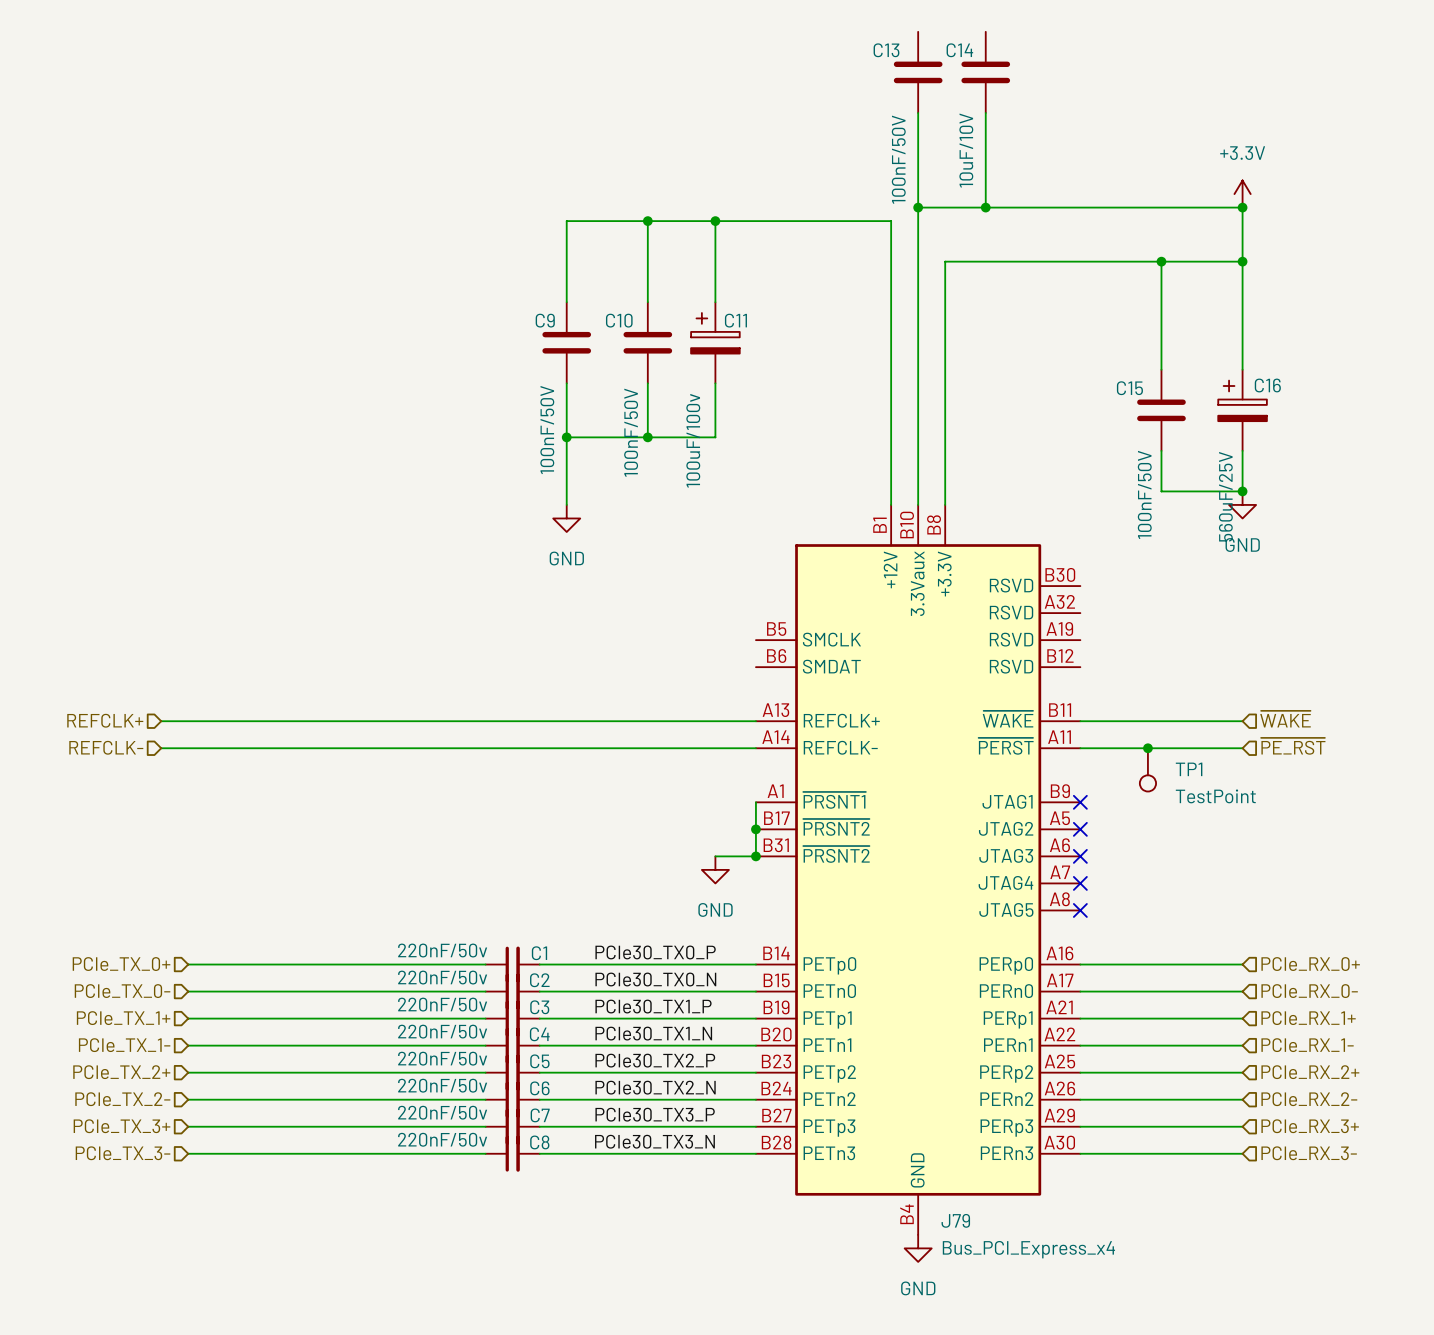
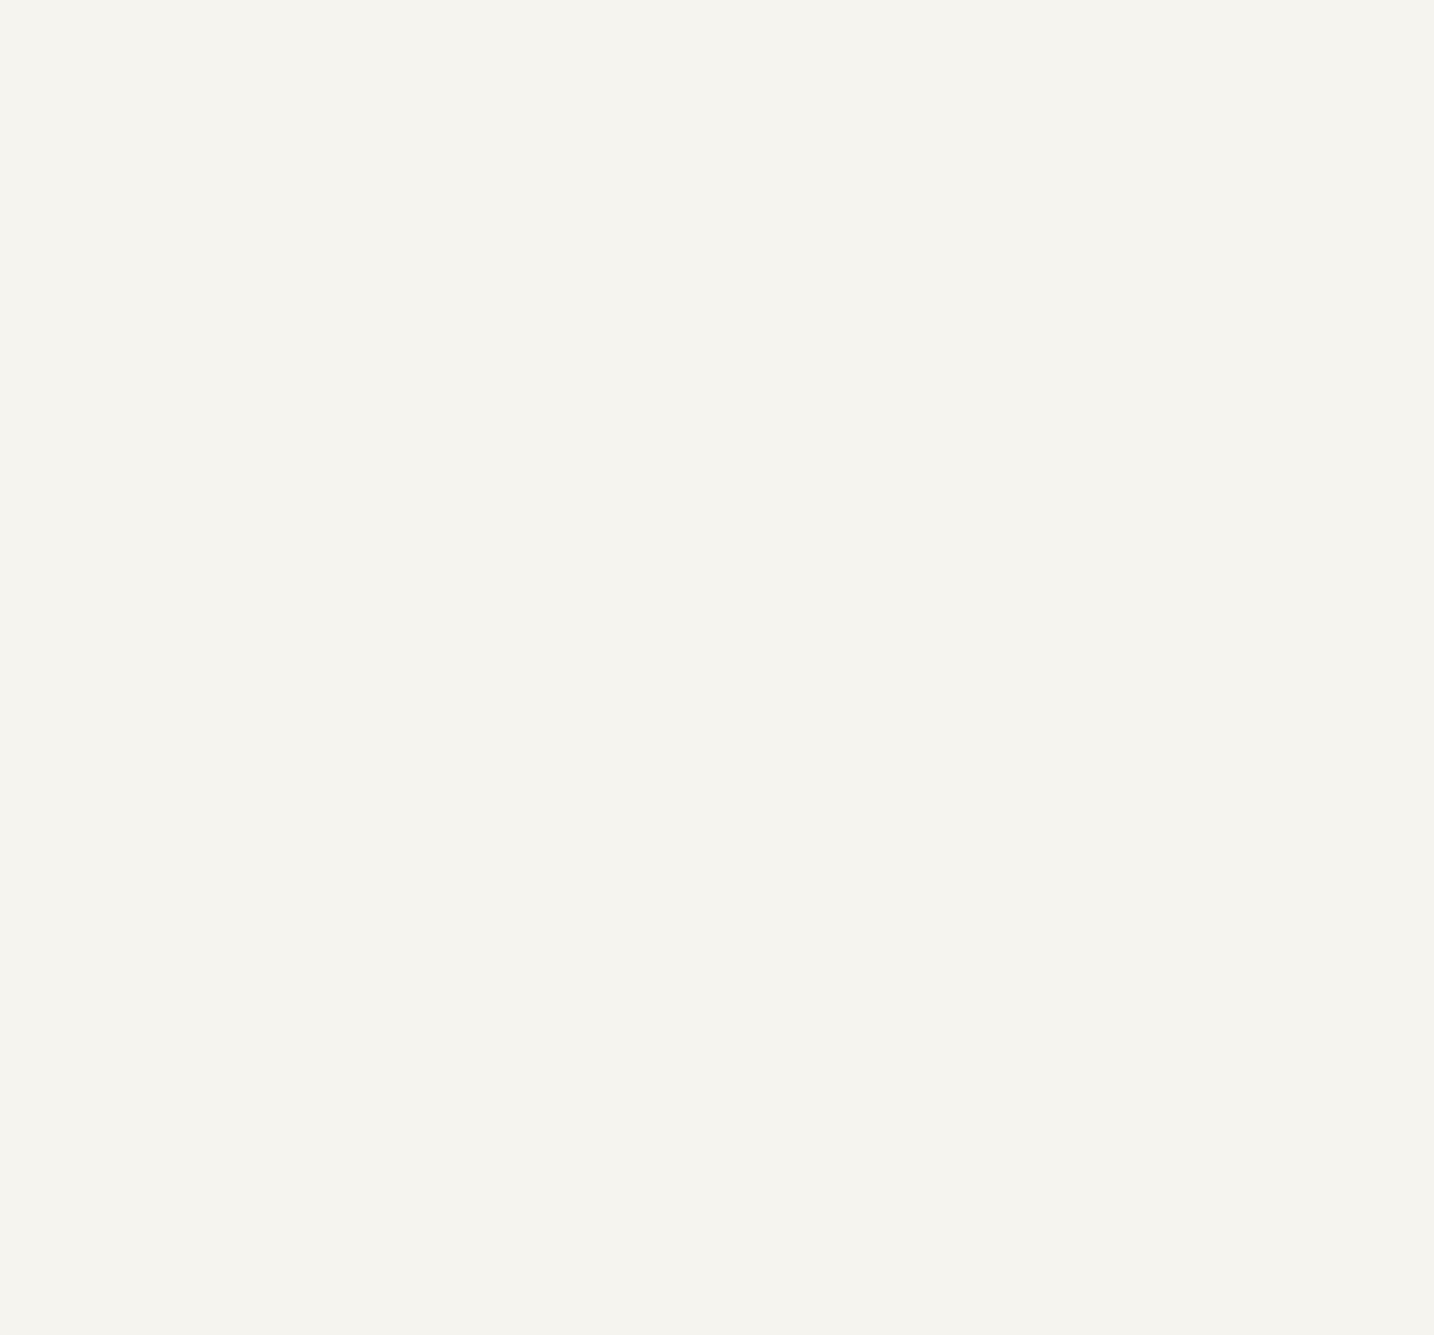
C13: 100nF/50V (918, 72) -> none
C14: 10uF/10V (985, 72) -> none
wire: (918, 112) (918, 504) -> none
wire: (985, 112) (985, 207) -> none
power symbol: +3.3V (1242, 194) -> none
wire: (918, 207) (1242, 207) (1242, 369) -> none
junction: (918, 207) -> none
junction: (985, 207) -> none
junction: (1242, 207) -> none
wire: (647, 221) (647, 302) -> none
junction: (647, 221) -> none
wire: (715, 221) (715, 302) -> none
junction: (715, 221) -> none
wire: (1161, 261) (1161, 369) -> none
junction: (1161, 261) -> none
wire: (1242, 261) (945, 261) (945, 504) -> none
junction: (1242, 261) -> none
wire: (566, 302) (566, 221) (891, 221) (891, 504) -> none
C9: 100nF/50V (566, 342) -> none
C10: 100nF/50V (647, 342) -> none
C11: 100uF/100v (715, 342) -> none
wire: (566, 383) (566, 504) -> none
wire: (647, 383) (647, 437) -> none
wire: (715, 383) (715, 437) (566, 437) -> none
C15: 100nF/50V (1161, 410) -> none
C16: 560uF/25V (1242, 410) -> none
junction: (566, 437) -> none
junction: (647, 437) -> none
wire: (1161, 450) (1161, 491) (1242, 491) (1242, 450) -> none
junction: (1242, 491) -> none
power symbol: GND (1242, 504) -> none
power symbol: GND (566, 518) -> none
hierarchical label: ~{WAKE} (1285, 719) -> none
hierarchical label: REFCLK+ (105, 720) -> none
wire: (161, 721) (755, 721) -> none
wire: (1080, 721) (1242, 721) -> none
hierarchical label: ~{PE_RST} (1293, 746) -> none
hierarchical label: REFCLK- (106, 747) -> none
wire: (161, 748) (755, 748) -> none
wire: (1080, 748) (1242, 748) -> none
junction: (1147, 748) -> none
TP1: TestPoint (1147, 769) -> none
wire: (755, 802) (755, 856) (715, 856) -> none
no-connect mark: (1080, 802) -> none
junction: (755, 829) -> none
no-connect mark: (1080, 829) -> none
junction: (755, 856) -> none
no-connect mark: (1080, 856) -> none
power symbol: GND (715, 869) -> none
J79: Bus_PCI_Express_x4 (918, 869) -> none
no-connect mark: (1080, 883) -> none
no-connect mark: (1080, 910) -> none
label: PCIe30_TX0_P (655, 952) -> none
hierarchical label: PCIe_TX_0+ (121, 964) -> none
wire: (188, 964) (485, 964) -> none
C1: 220nF/50v (512, 964) -> none
wire: (539, 964) (755, 964) -> none
wire: (1080, 964) (1242, 964) -> none
hierarchical label: PCIe_RX_0+ (1310, 964) -> none
label: PCIe30_TX0_N (655, 979) -> none
hierarchical label: PCIe_TX_0- (122, 991) -> none
wire: (188, 991) (485, 991) -> none
C2: 220nF/50v (512, 991) -> none
wire: (539, 991) (755, 991) -> none
wire: (1080, 991) (1242, 991) -> none
hierarchical label: PCIe_RX_0- (1309, 991) -> none
label: PCIe30_TX1_P (653, 1006) -> none
hierarchical label: PCIe_TX_1+ (123, 1018) -> none
wire: (188, 1018) (485, 1018) -> none
C3: 220nF/50v (512, 1018) -> none
wire: (539, 1018) (755, 1018) -> none
wire: (1080, 1018) (1242, 1018) -> none
hierarchical label: PCIe_RX_1+ (1308, 1018) -> none
label: PCIe30_TX1_N (653, 1033) -> none
hierarchical label: PCIe_TX_1- (124, 1045) -> none
wire: (188, 1045) (485, 1045) -> none
C4: 220nF/50v (512, 1045) -> none
wire: (539, 1045) (755, 1045) -> none
wire: (1080, 1045) (1242, 1045) -> none
hierarchical label: PCIe_RX_1- (1307, 1045) -> none
label: PCIe30_TX2_P (655, 1060) -> none
hierarchical label: PCIe_TX_2+ (121, 1072) -> none
wire: (188, 1072) (485, 1072) -> none
C5: 220nF/50v (512, 1072) -> none
wire: (539, 1072) (755, 1072) -> none
wire: (1080, 1072) (1242, 1072) -> none
hierarchical label: PCIe_RX_2+ (1310, 1072) -> none
label: PCIe30_TX2_N (655, 1087) -> none
hierarchical label: PCIe_TX_2- (122, 1099) -> none
wire: (188, 1099) (485, 1099) -> none
C6: 220nF/50v (512, 1099) -> none
wire: (539, 1099) (755, 1099) -> none
wire: (1080, 1099) (1242, 1099) -> none
hierarchical label: PCIe_RX_2- (1309, 1099) -> none
label: PCIe30_TX3_P (655, 1114) -> none
hierarchical label: PCIe_TX_3+ (121, 1126) -> none
wire: (188, 1126) (485, 1126) -> none
C7: 220nF/50v (512, 1126) -> none
wire: (539, 1126) (755, 1126) -> none
wire: (1080, 1126) (1242, 1126) -> none
hierarchical label: PCIe_RX_3+ (1310, 1126) -> none
label: PCIe30_TX3_N (654, 1141) -> none
hierarchical label: PCIe_TX_3- (123, 1153) -> none
wire: (188, 1153) (485, 1153) -> none
C8: 220nF/50v (512, 1153) -> none
wire: (539, 1153) (755, 1153) -> none
wire: (1080, 1153) (1242, 1153) -> none
hierarchical label: PCIe_RX_3- (1309, 1153) -> none
power symbol: GND (918, 1248) -> none

